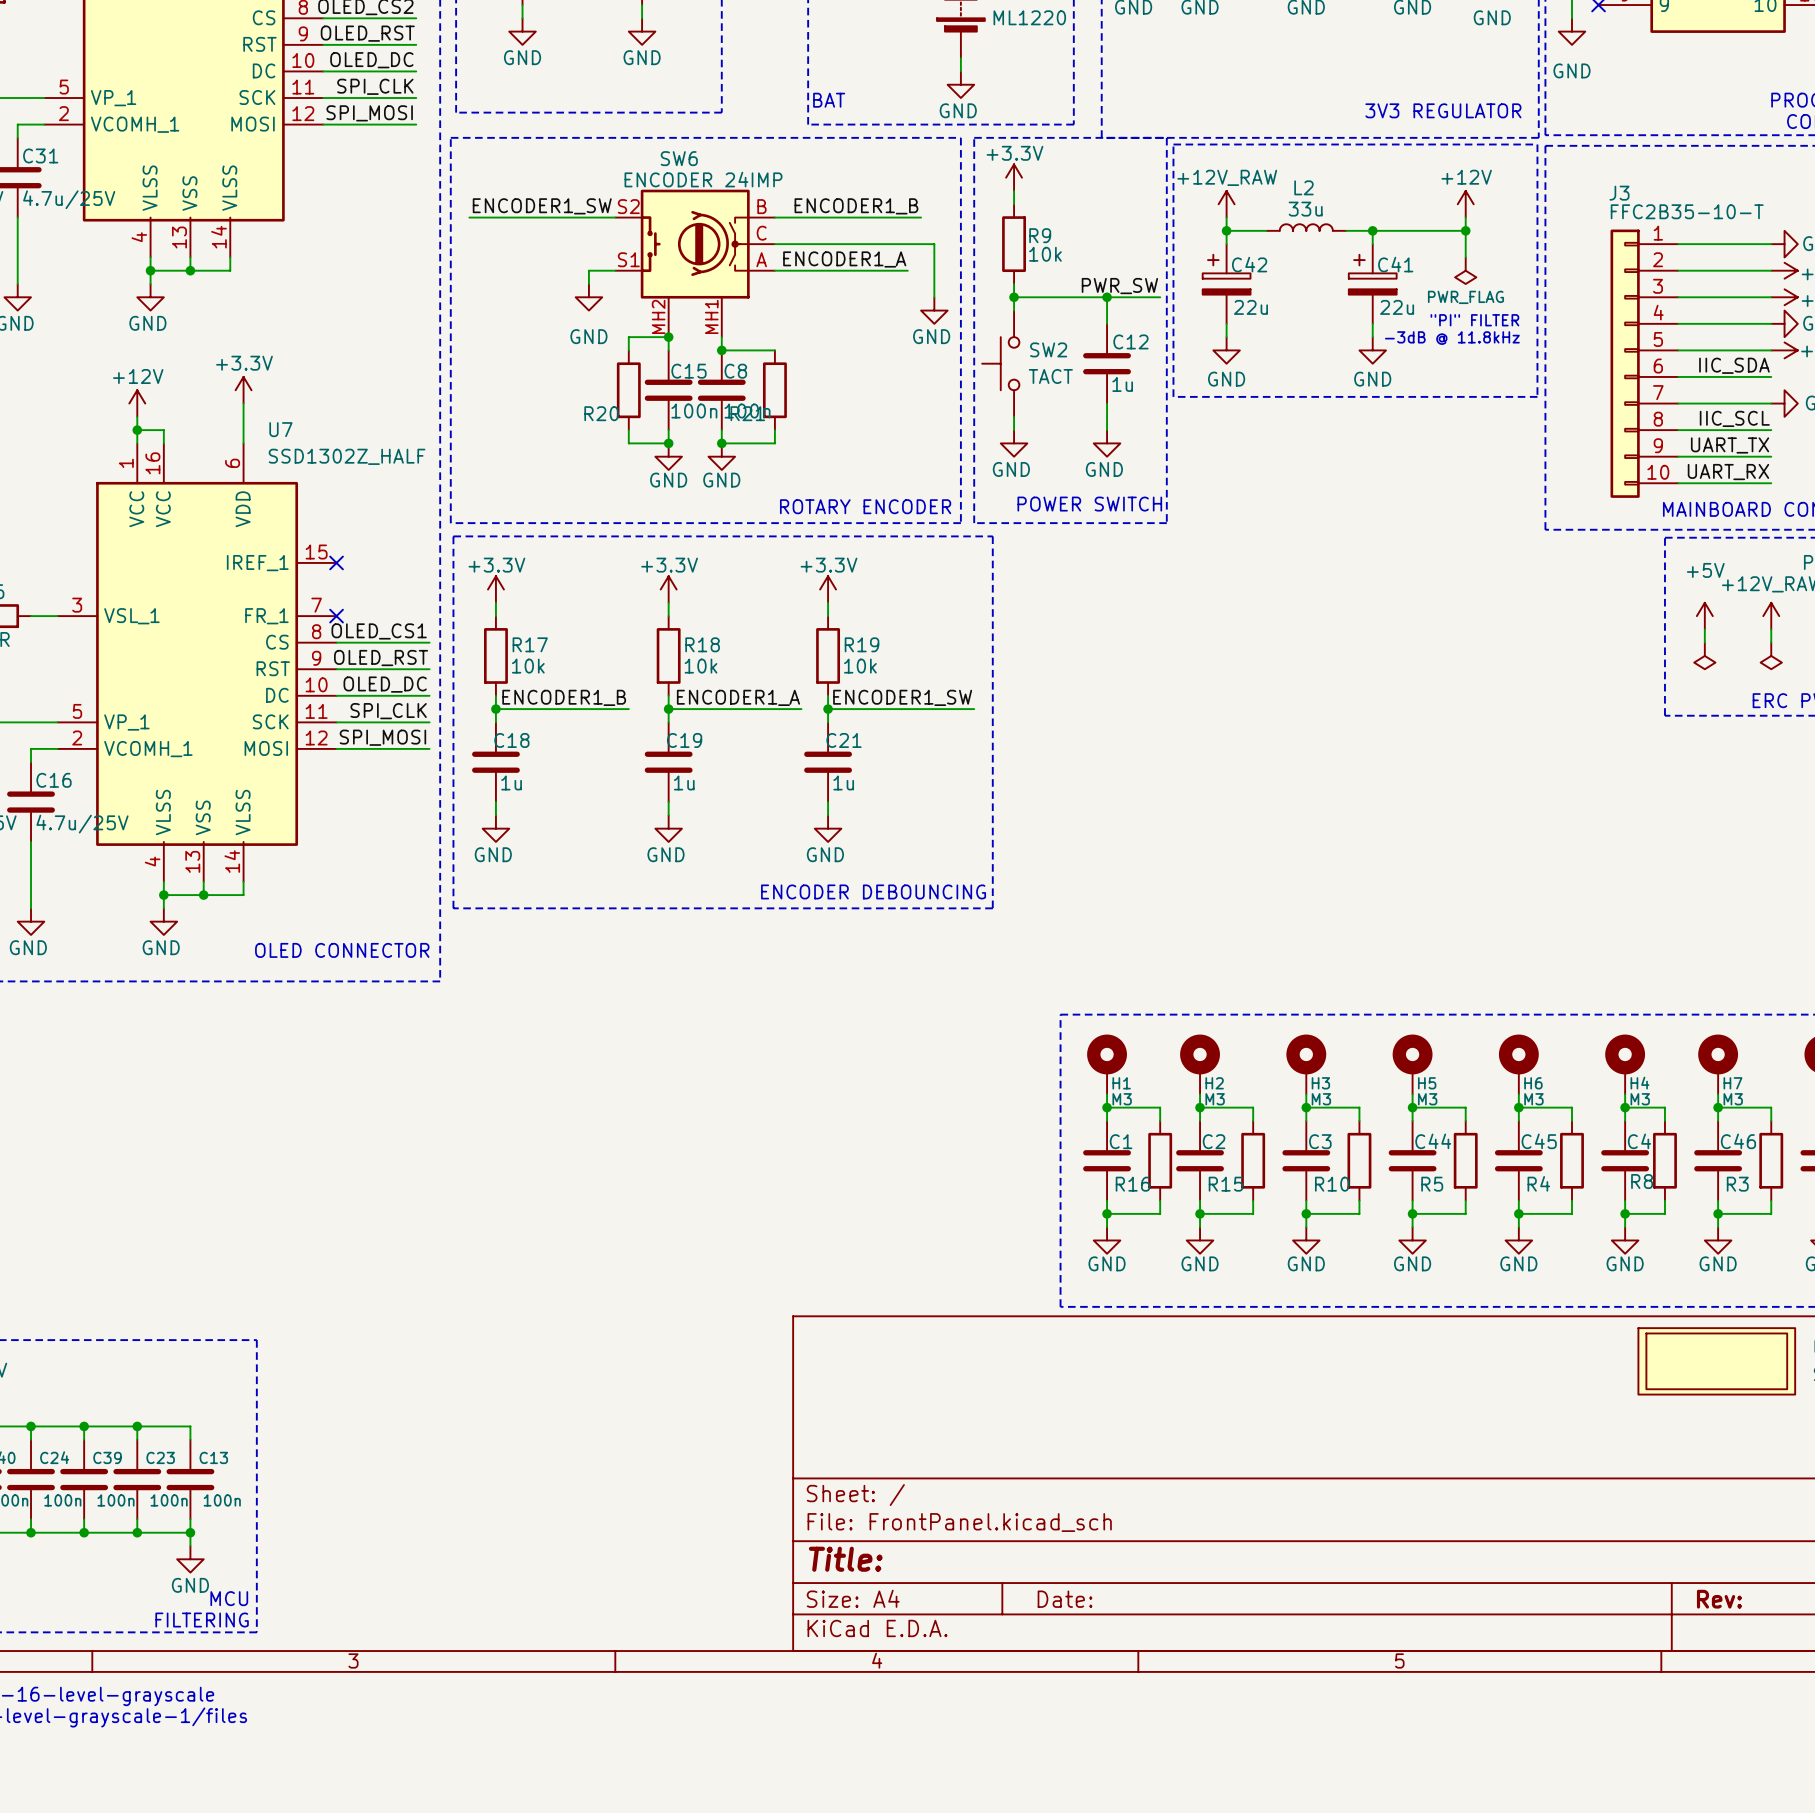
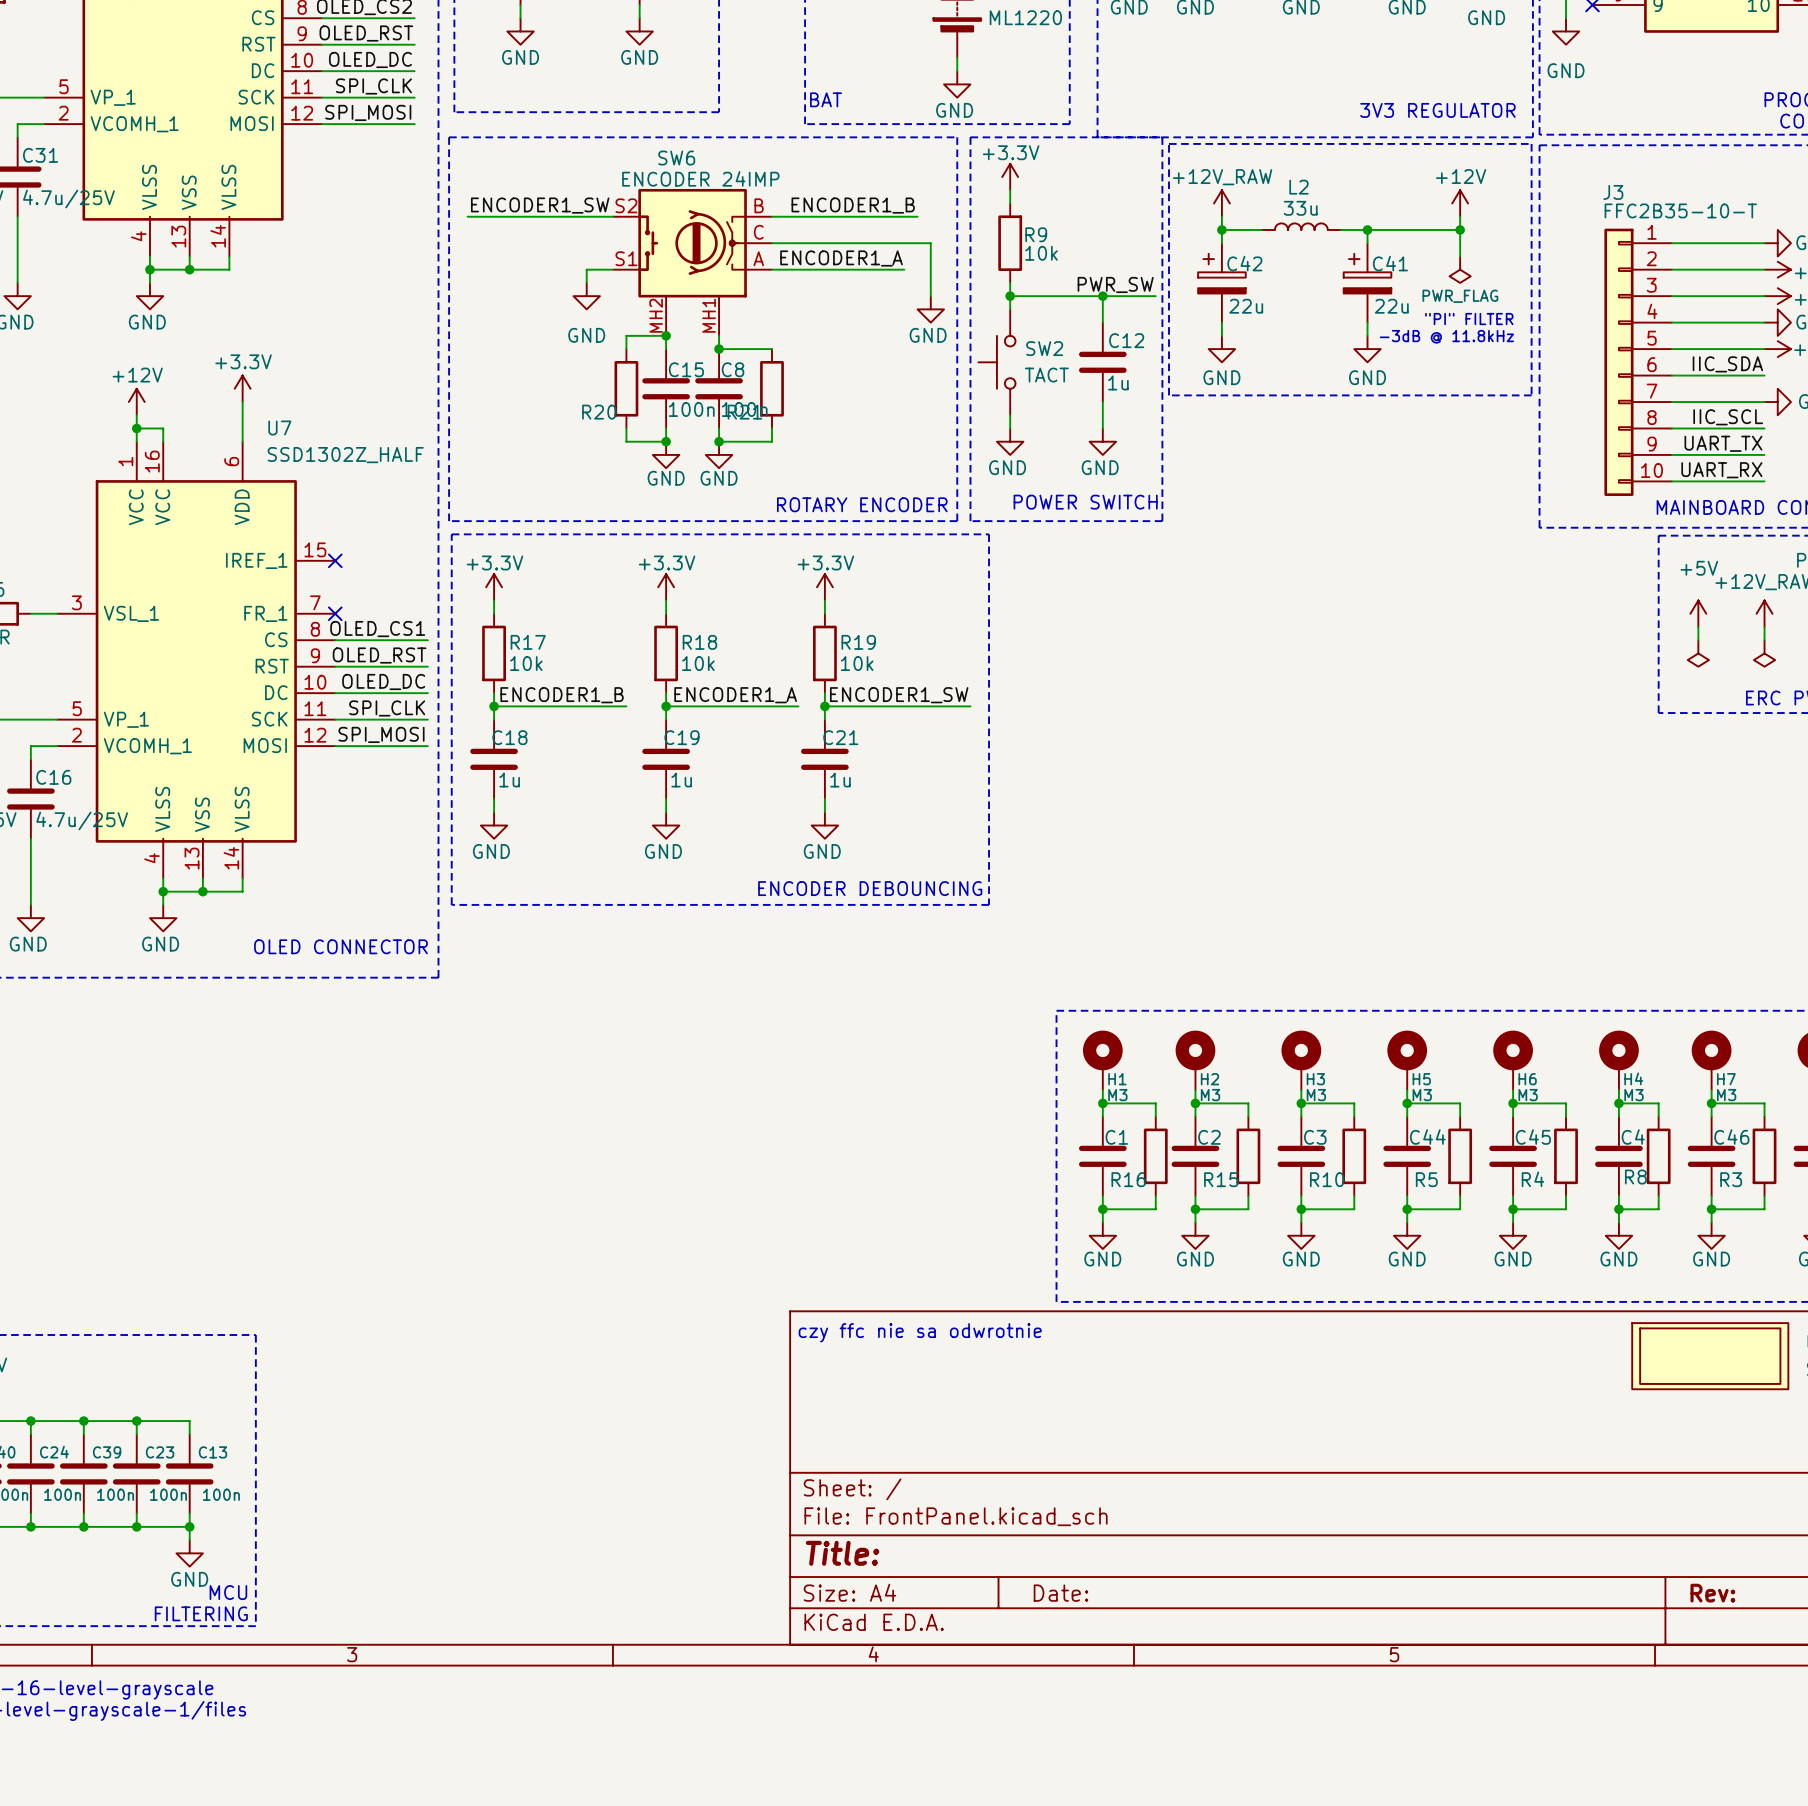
text: none -> czy ffc nie sa odwrotnie (920, 1332)

